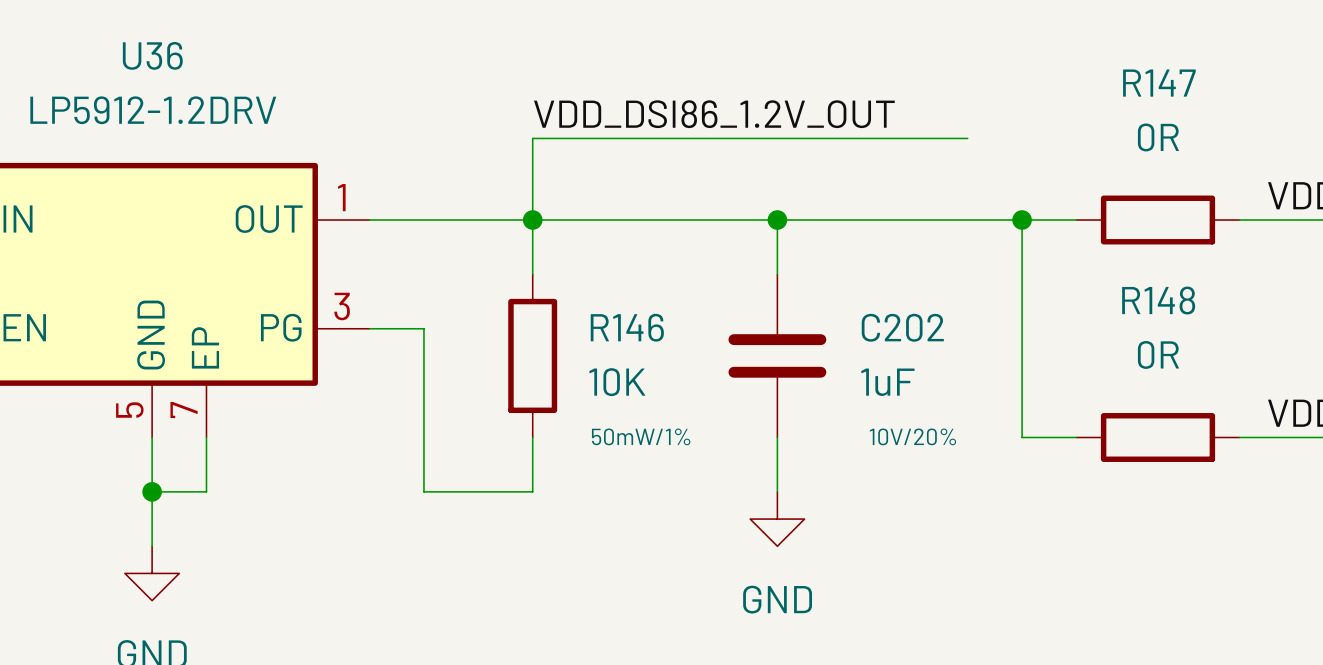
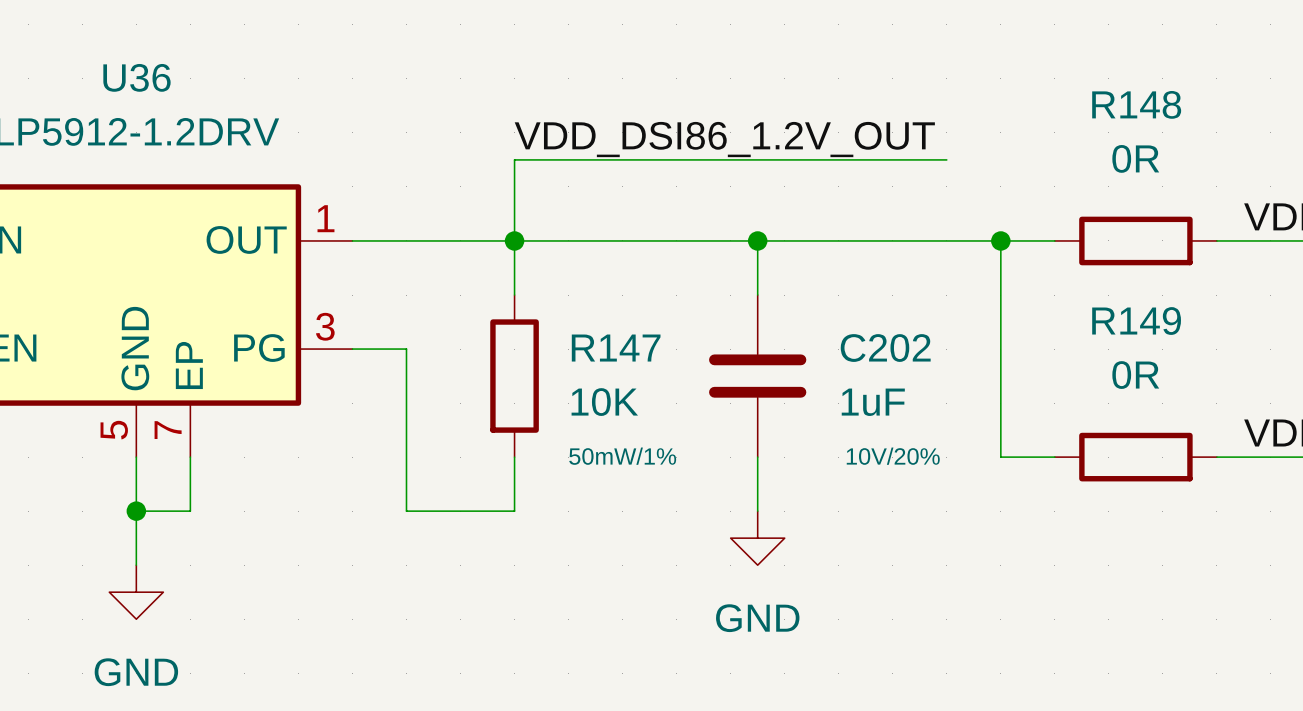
R147 name: R147 (1159, 83) -> R148 (1136, 104)
R148 name: R148 (1158, 300) -> R149 (1136, 321)
R146 name: R146 (627, 327) -> R147 (616, 348)

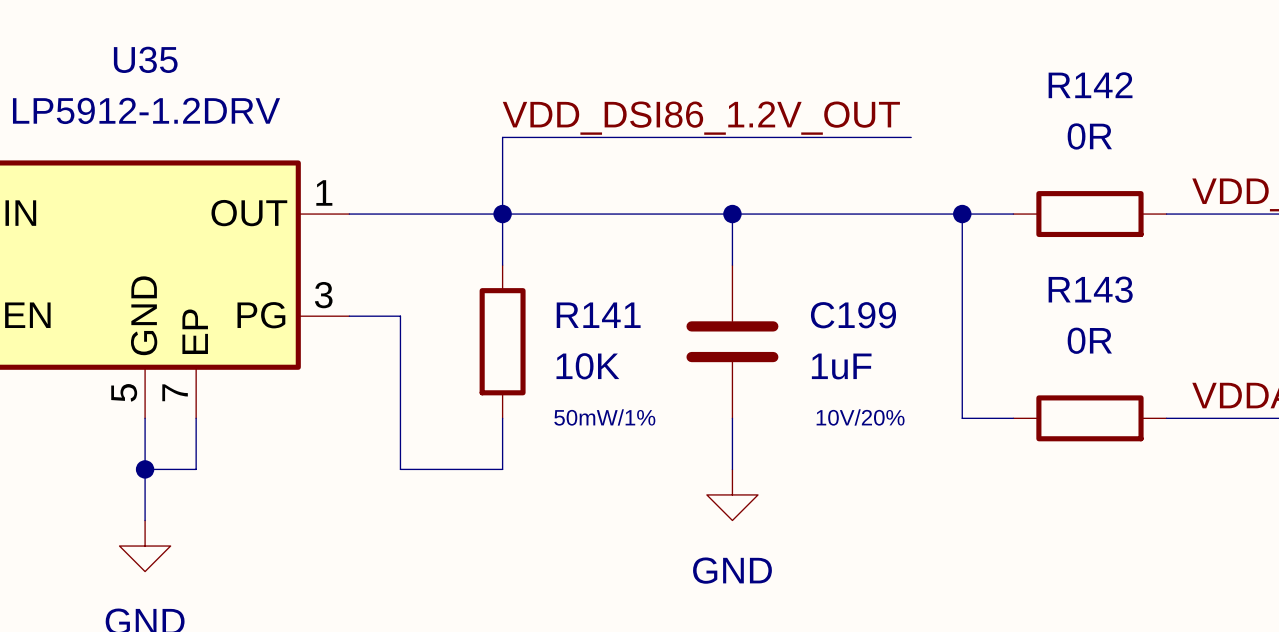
U36 name: U36 (136, 77) -> U35 (145, 59)
R148 name: R148 (1136, 104) -> R142 (1090, 85)
R149 name: R149 (1136, 321) -> R143 (1090, 289)
R147 name: R147 (616, 348) -> R141 (598, 315)
C202 name: C202 (885, 348) -> C199 (853, 315)

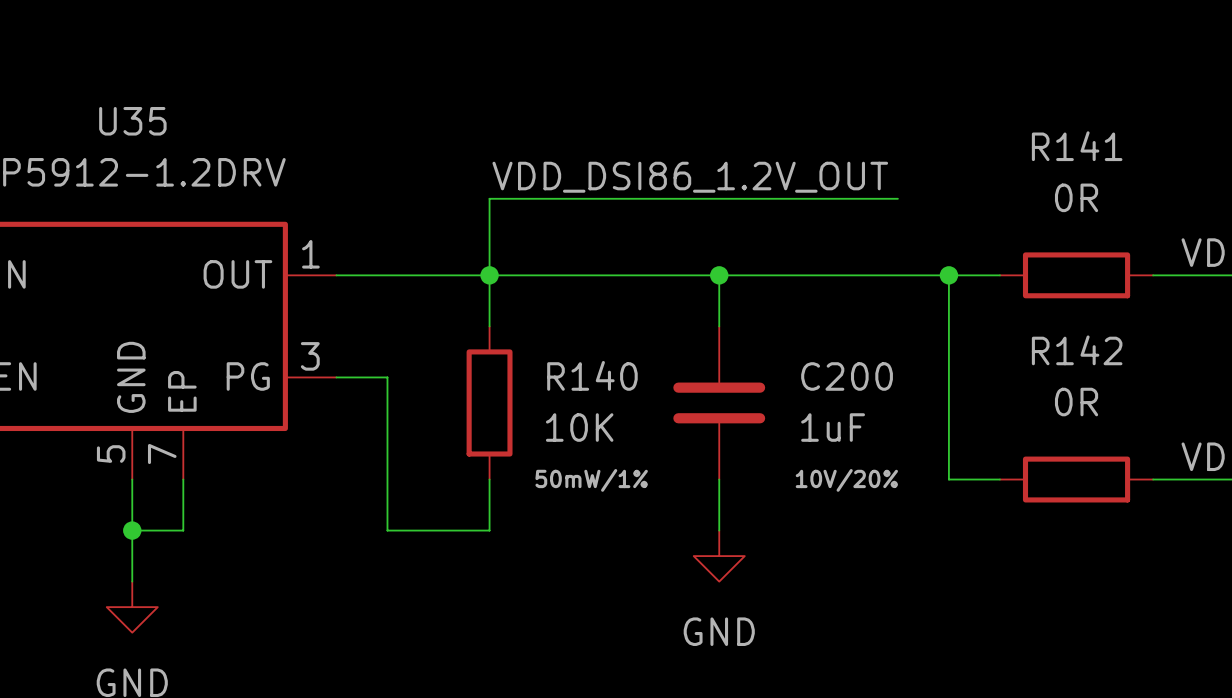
R142 name: R142 (1090, 85) -> R141 (1077, 146)
R143 name: R143 (1090, 289) -> R142 (1077, 350)
R141 name: R141 (598, 315) -> R140 (592, 375)
C199 name: C199 (853, 315) -> C200 (847, 376)

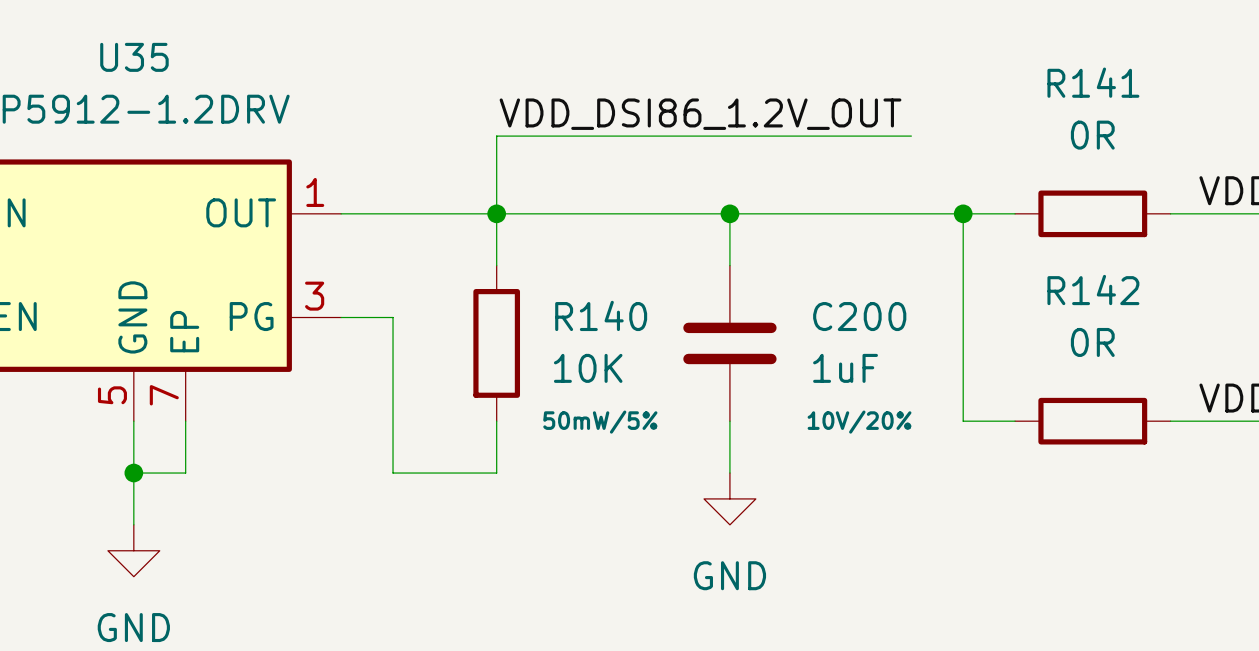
R140 text: 50mW/1% (591, 480) -> 50mW/5% (600, 422)

